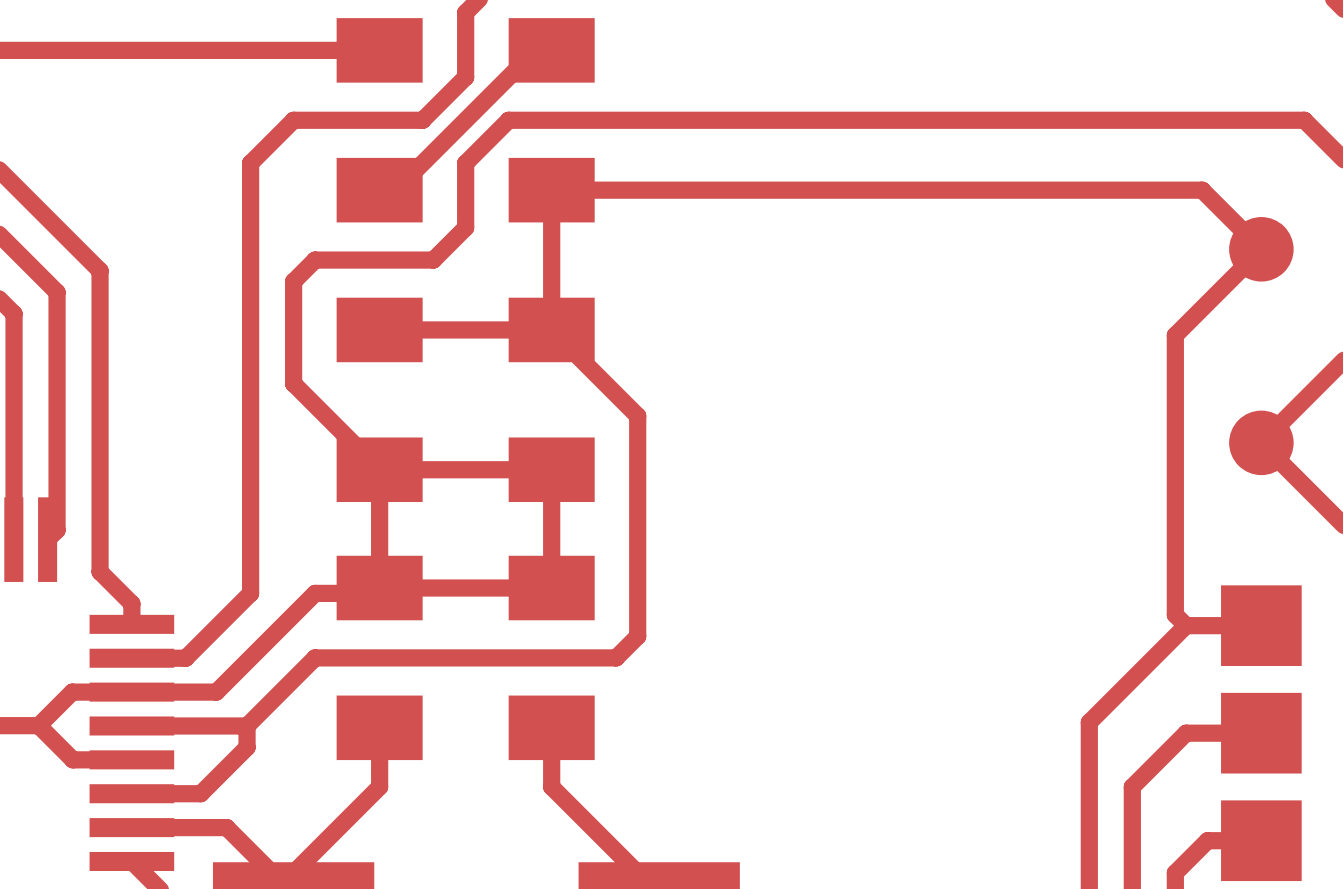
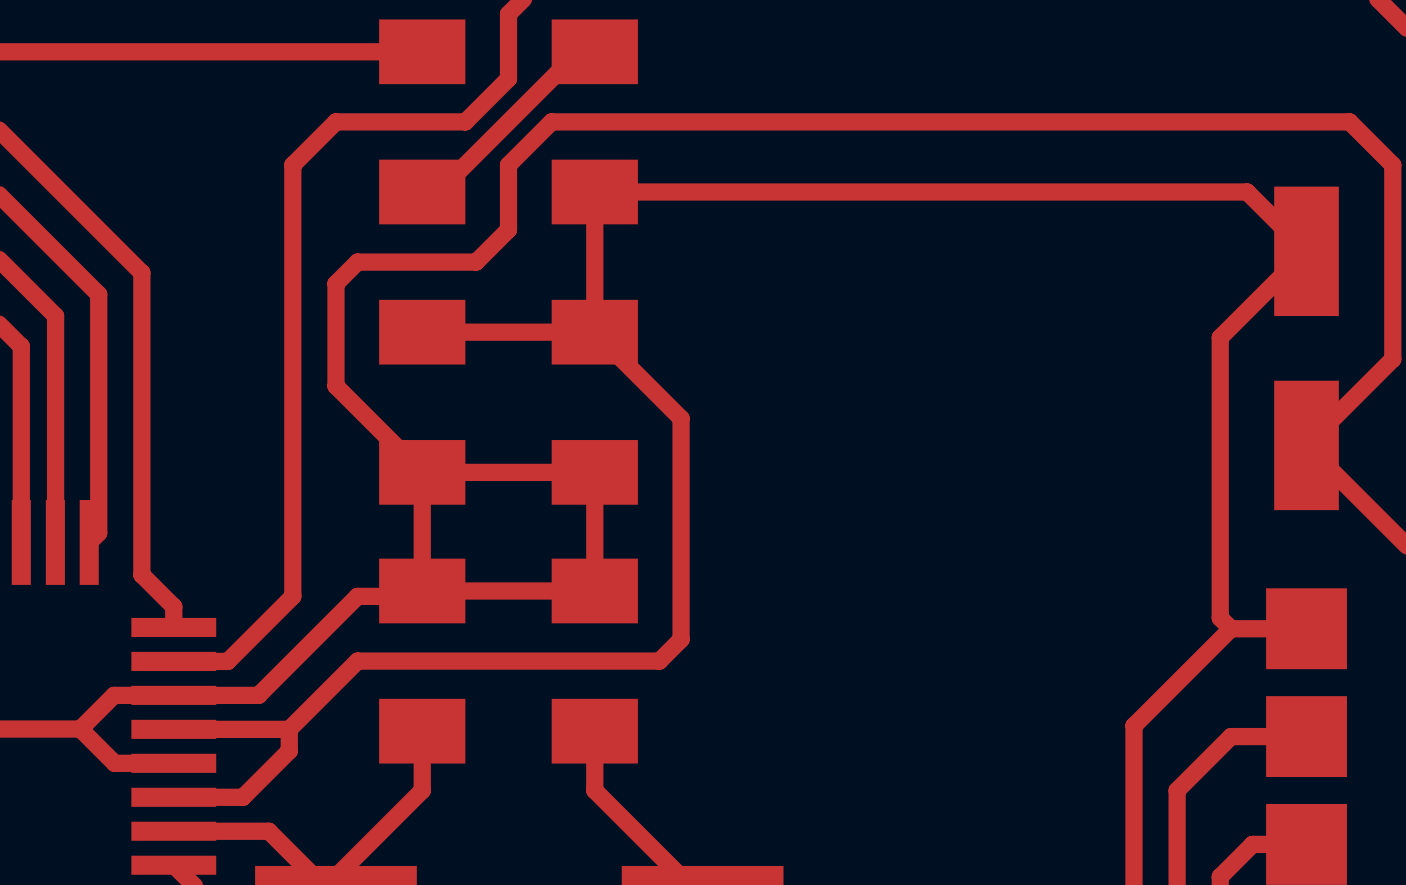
part footprint: [1229, 217, 1294, 282] -> [1274, 186, 1339, 317]
part footprint: [1229, 410, 1294, 476] -> [1274, 380, 1339, 511]

